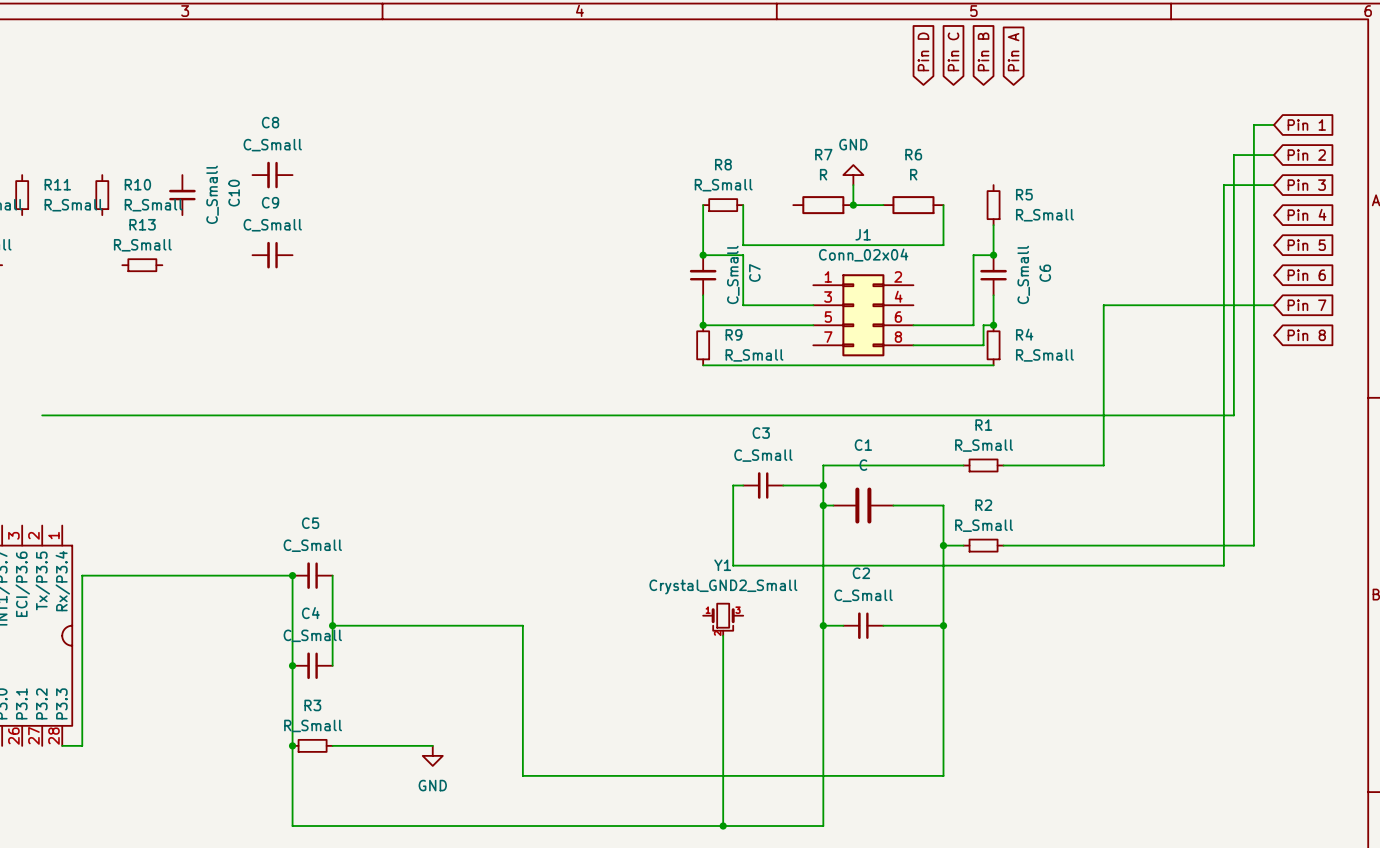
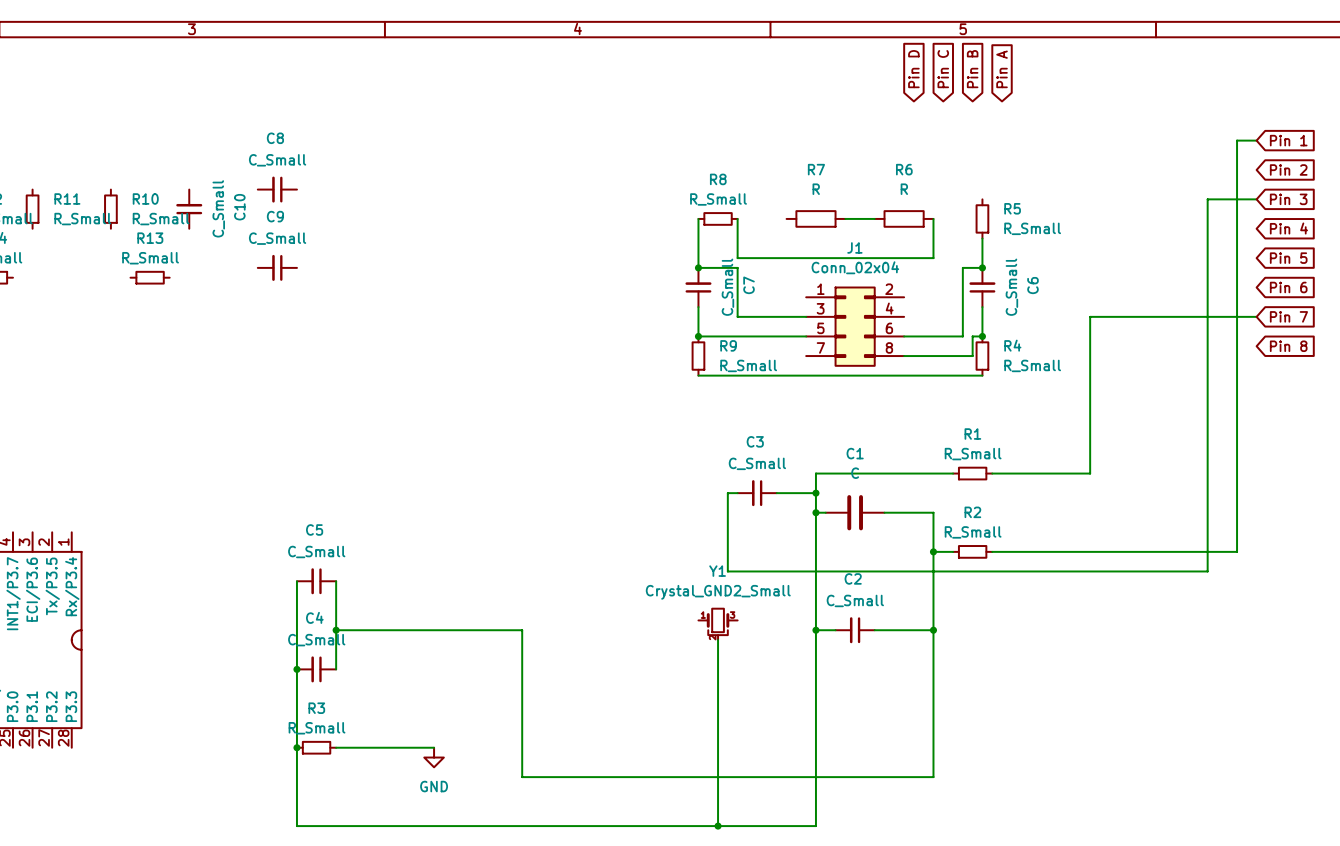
wire: (1273, 155) (1233, 155) (1233, 415) (42, 415) -> none
power symbol: GND (853, 175) -> none
wire: (853, 185) (853, 205) -> none
junction: (853, 205) -> none
wire: (292, 575) (82, 575) (82, 745) (62, 745) -> none
junction: (292, 575) -> none

